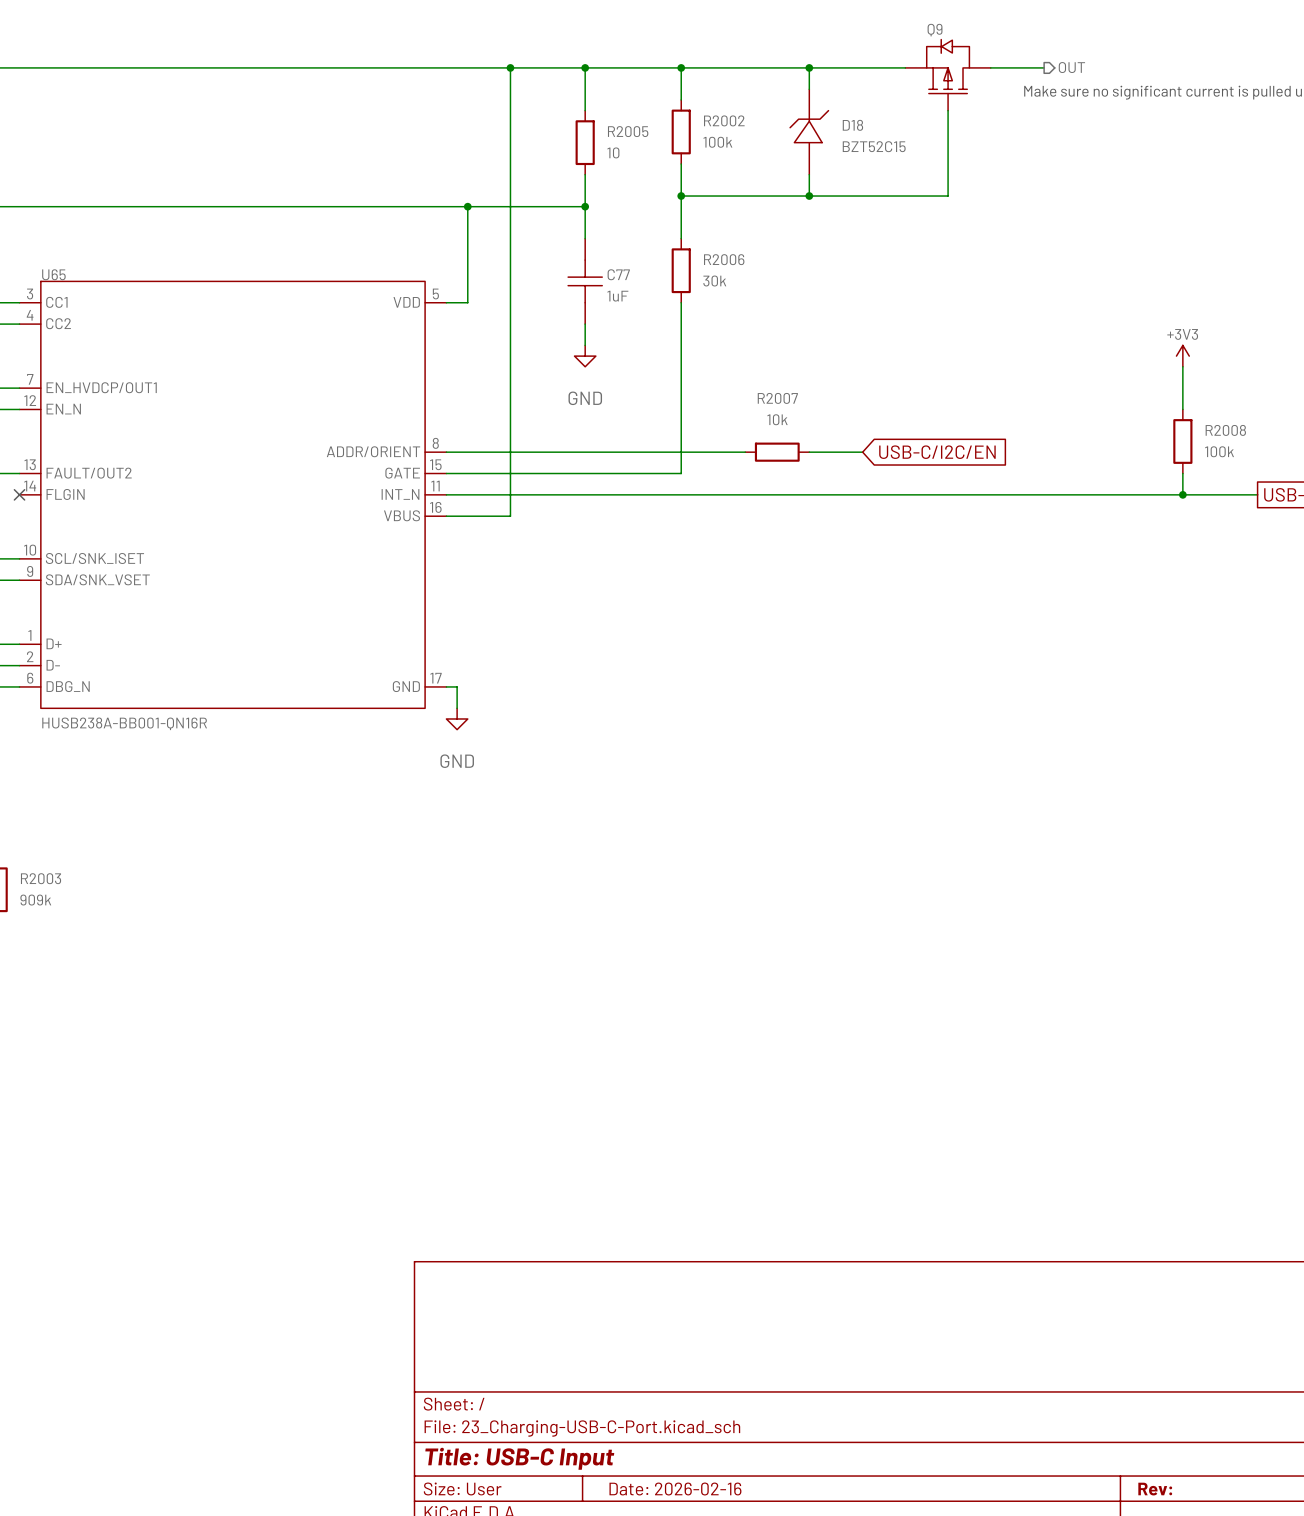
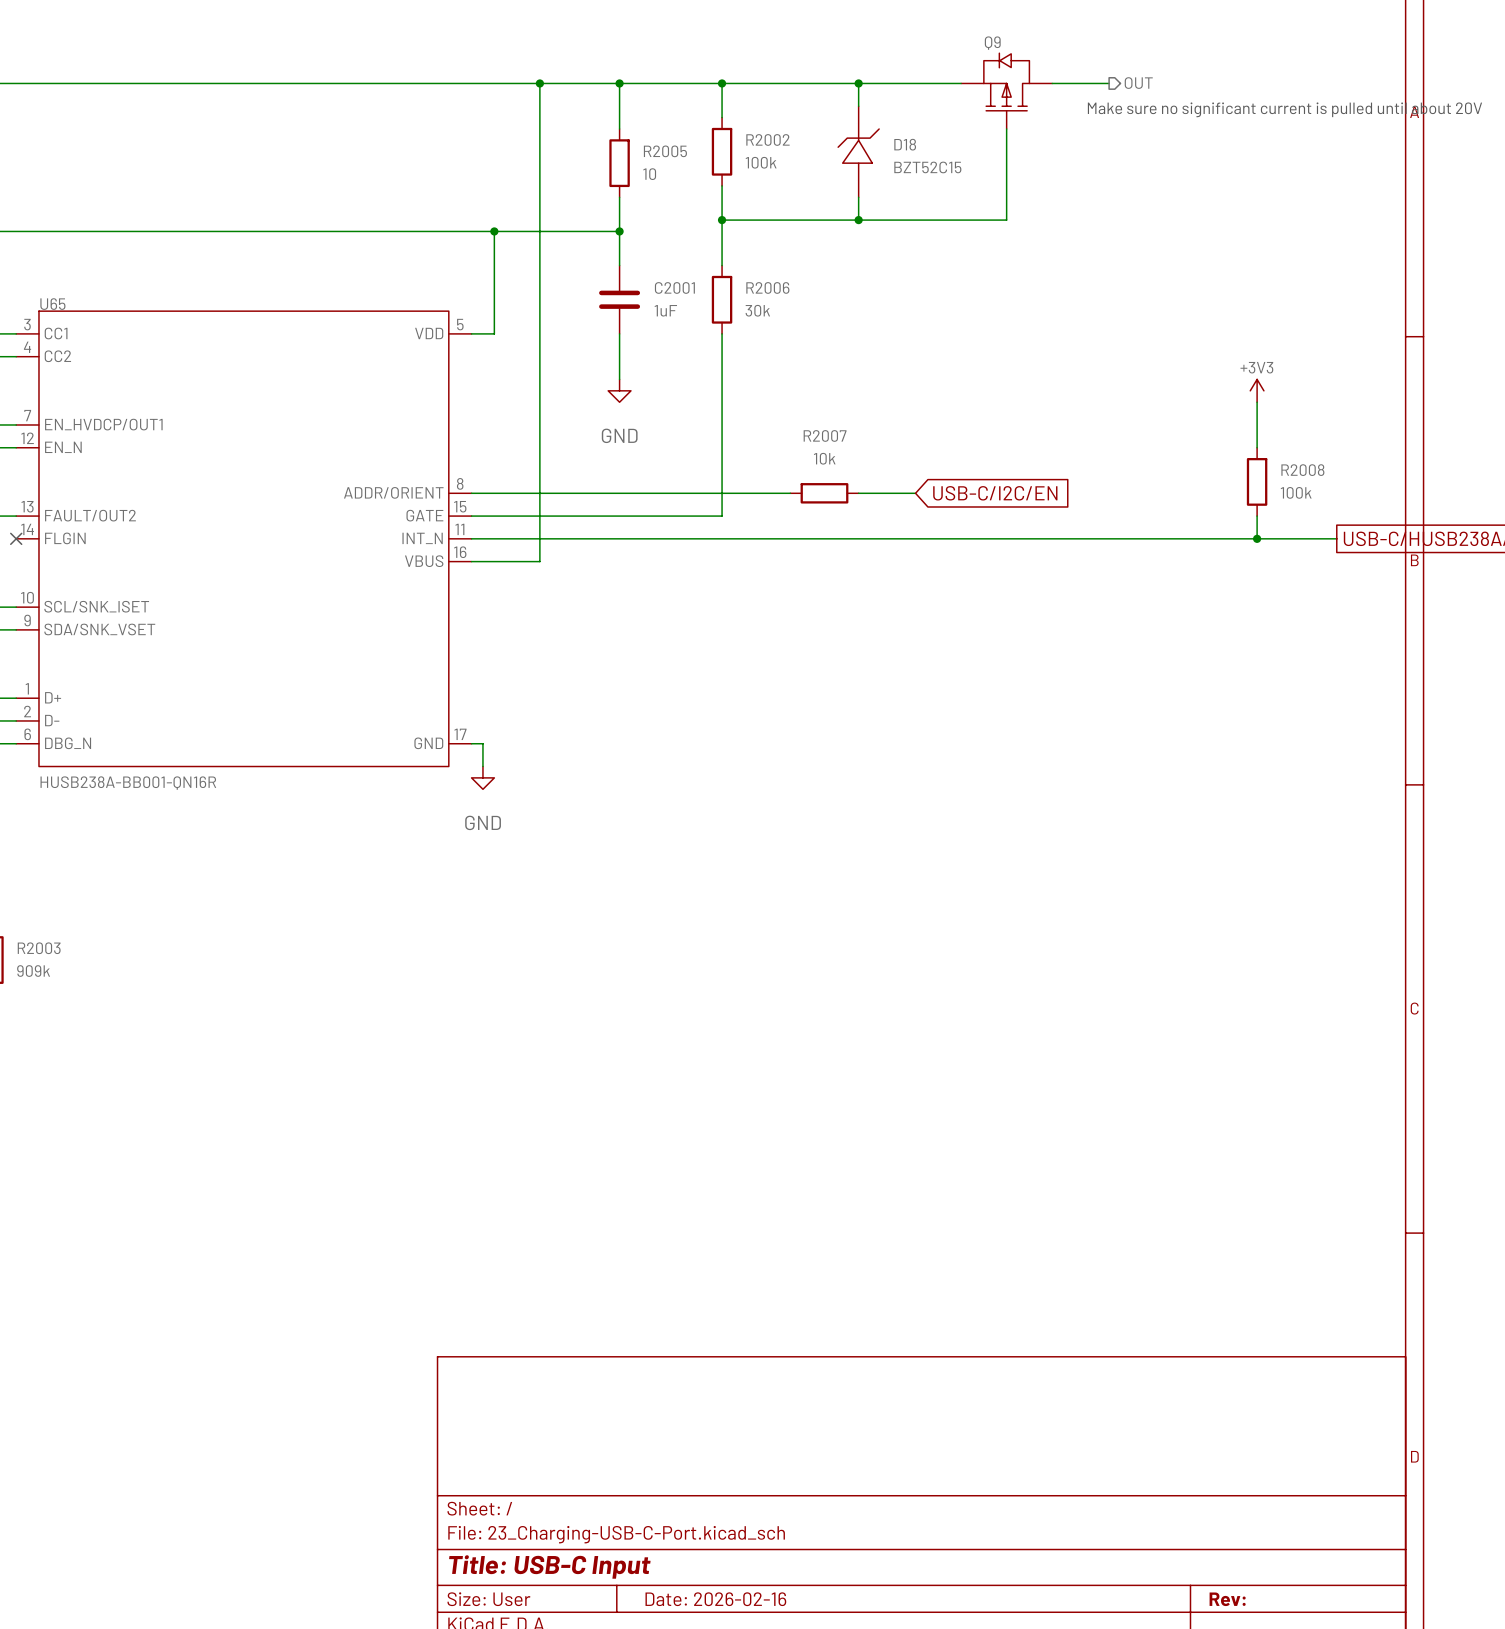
C2001: none -> 1uF (619, 299)
C77: 1uF (585, 281) -> none

